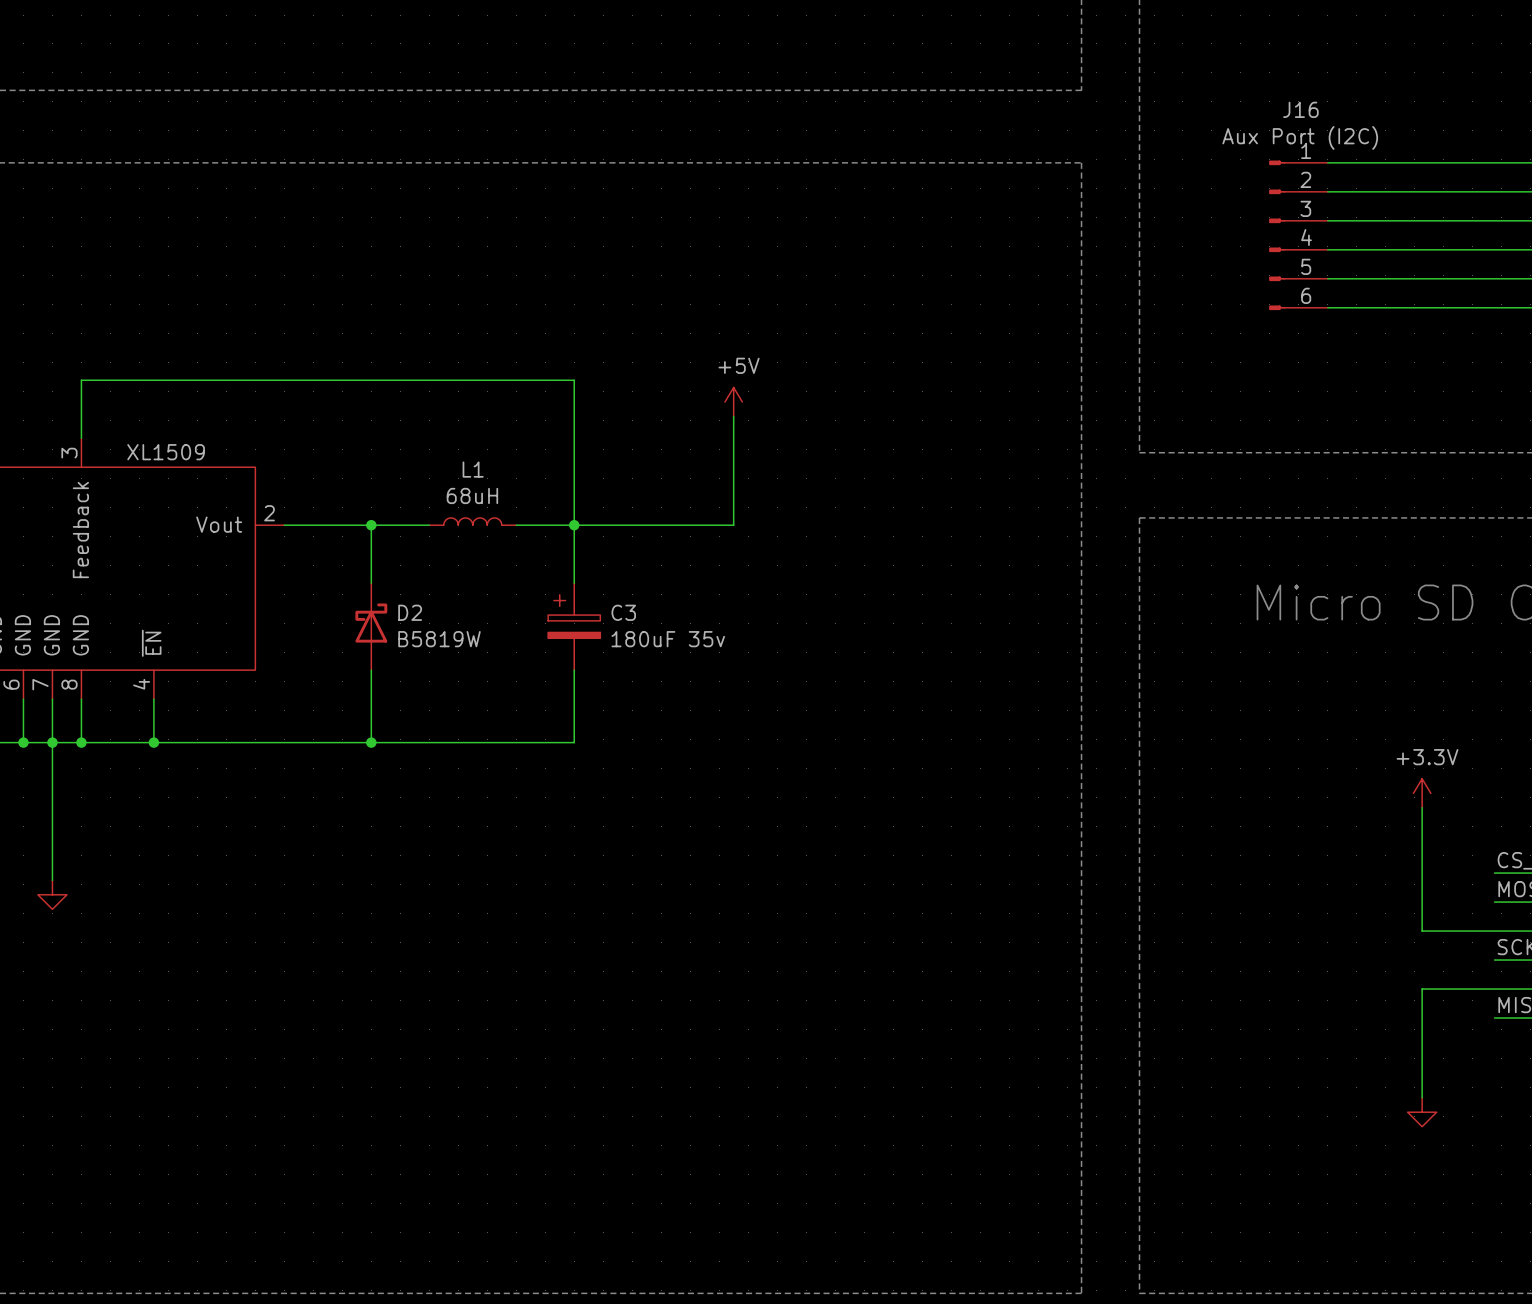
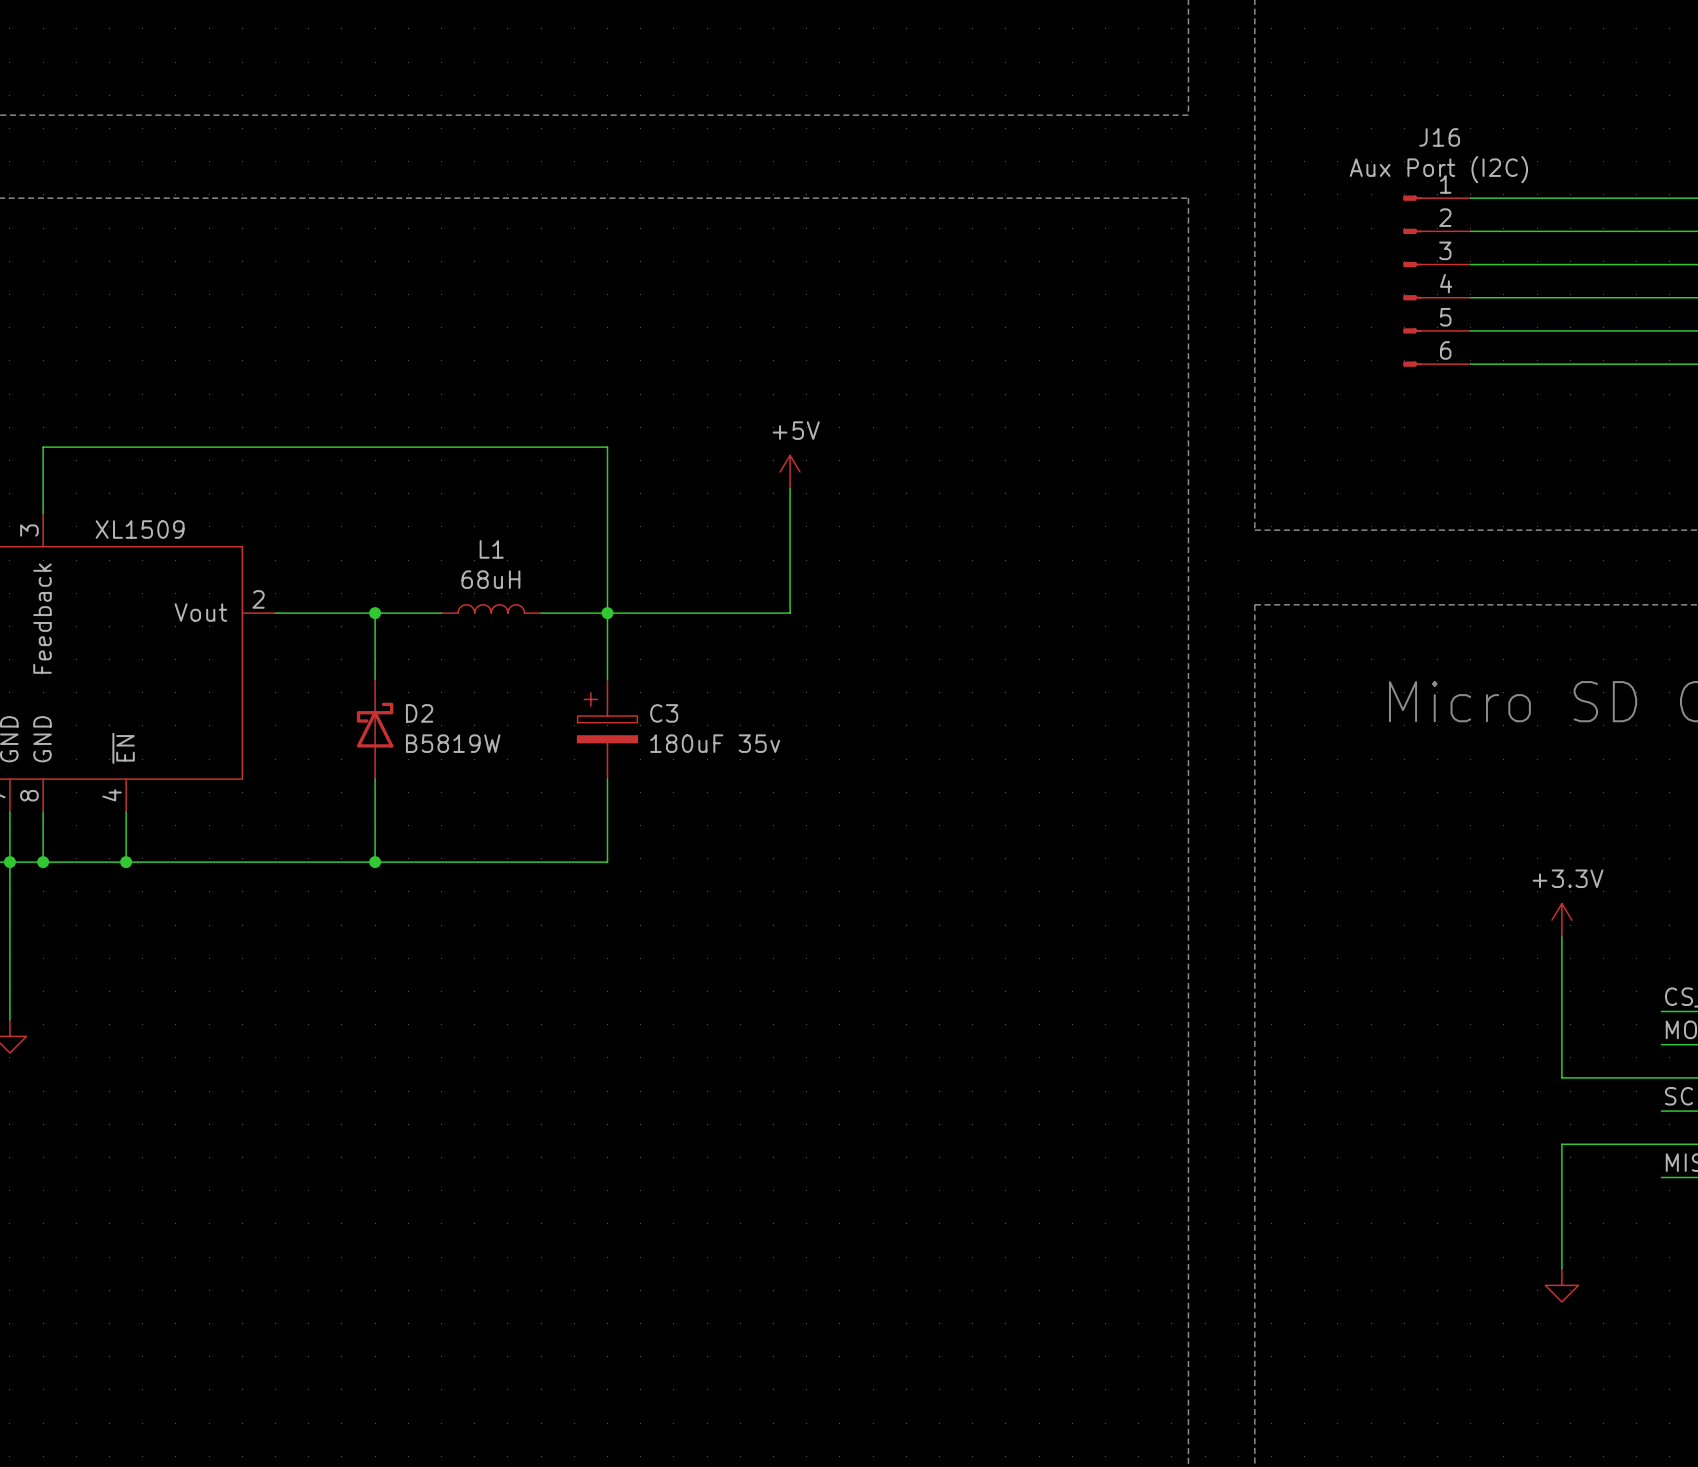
power symbol position: +3.3V (1422, 793) -> +3.3V (1561, 920)
wire: (1422, 807) (1422, 931) -> (1561, 936) (1561, 1077) (1578, 1077)
wire: (1422, 989) (1422, 1097) -> (1578, 1144) (1561, 1144) (1561, 1268)
power symbol position: (1422, 1112) -> (1561, 1285)

